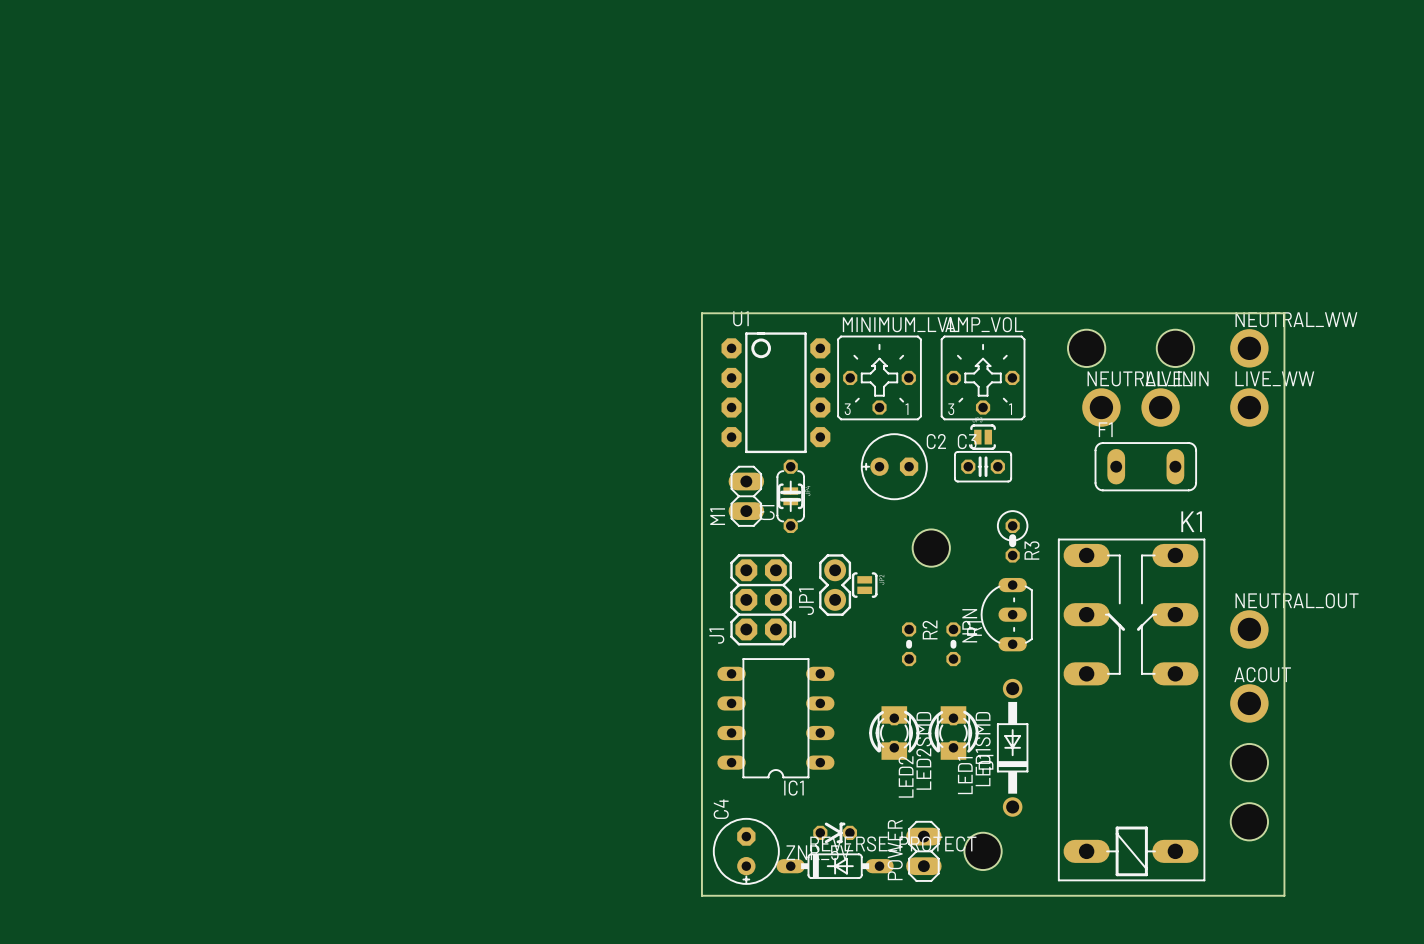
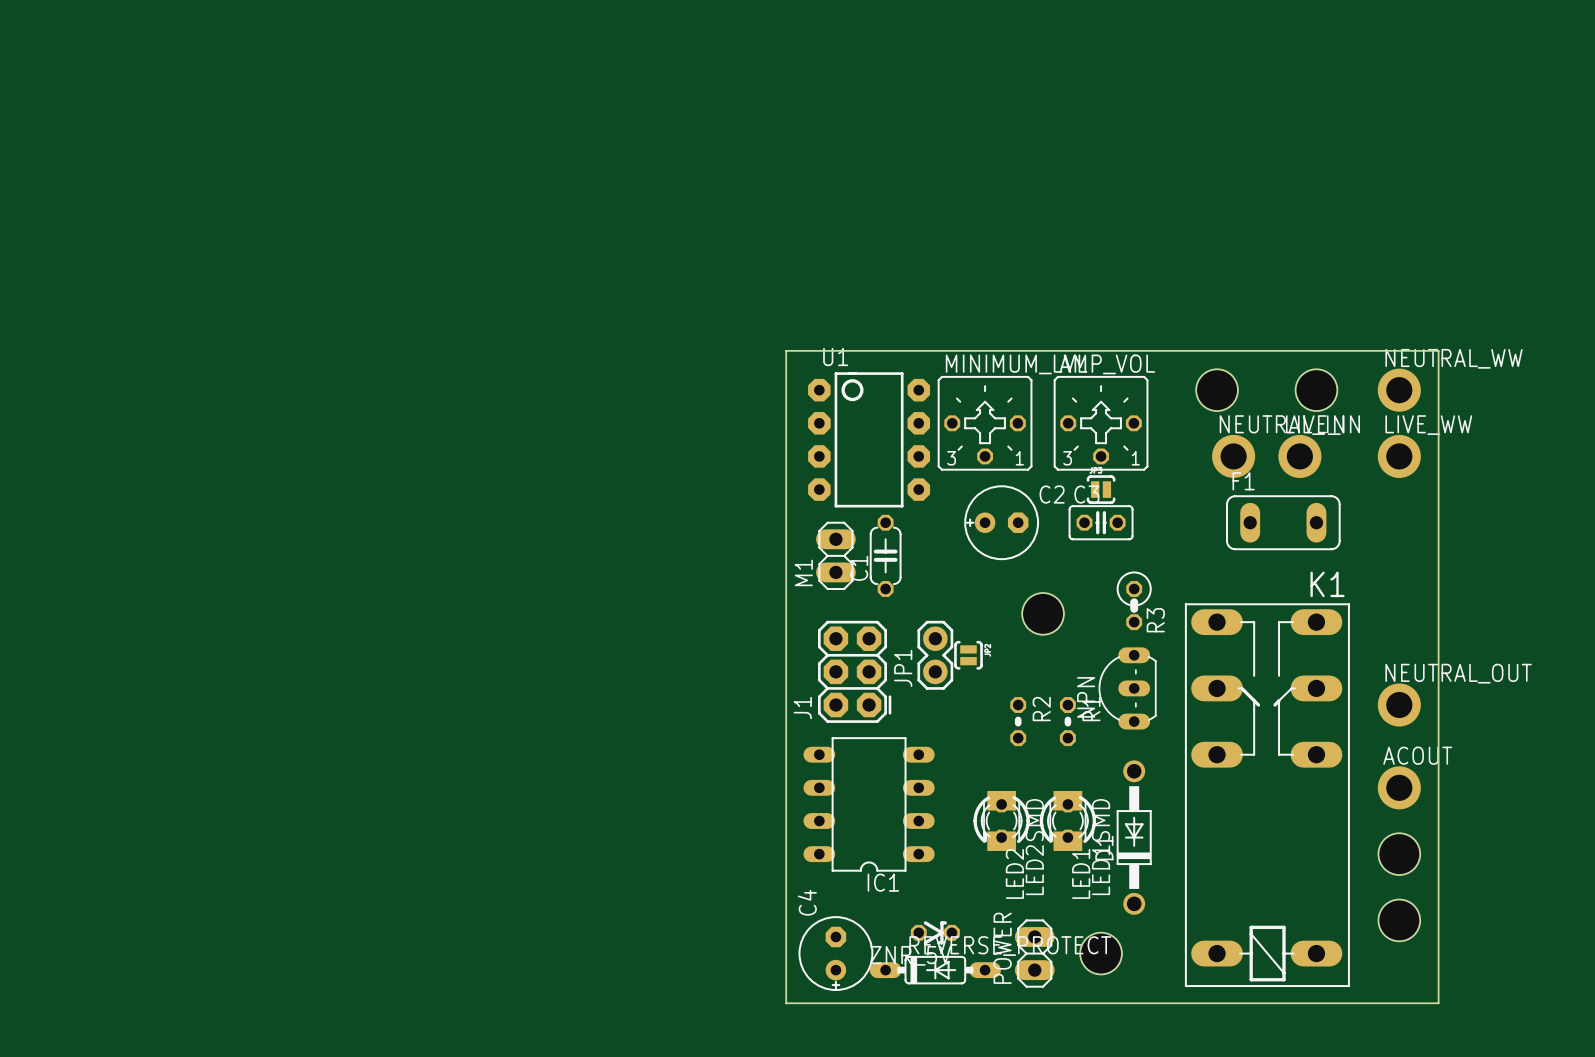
part: (790, 496) -> none

